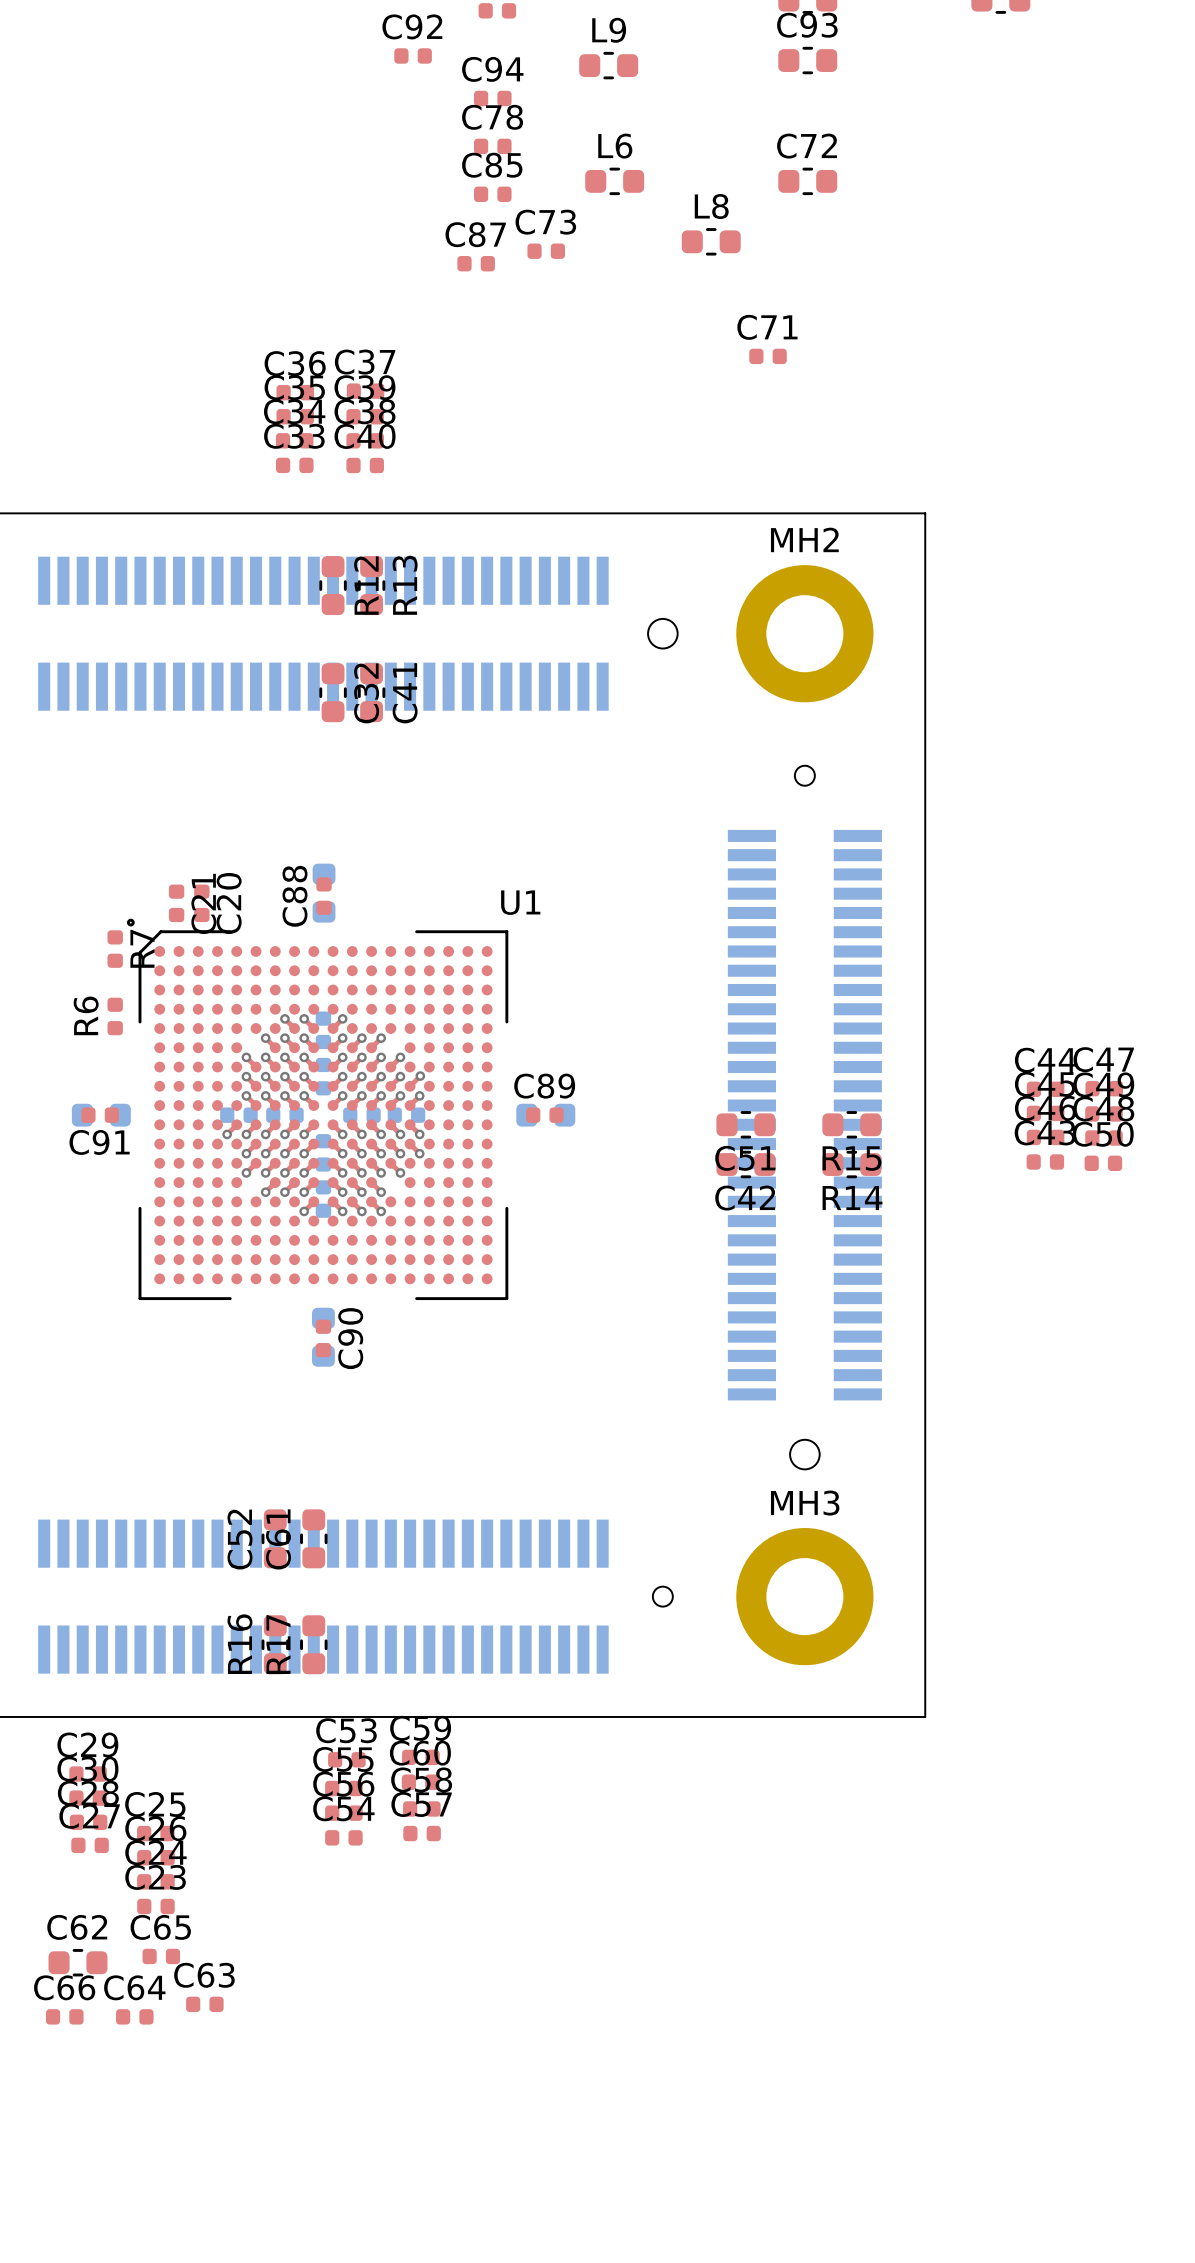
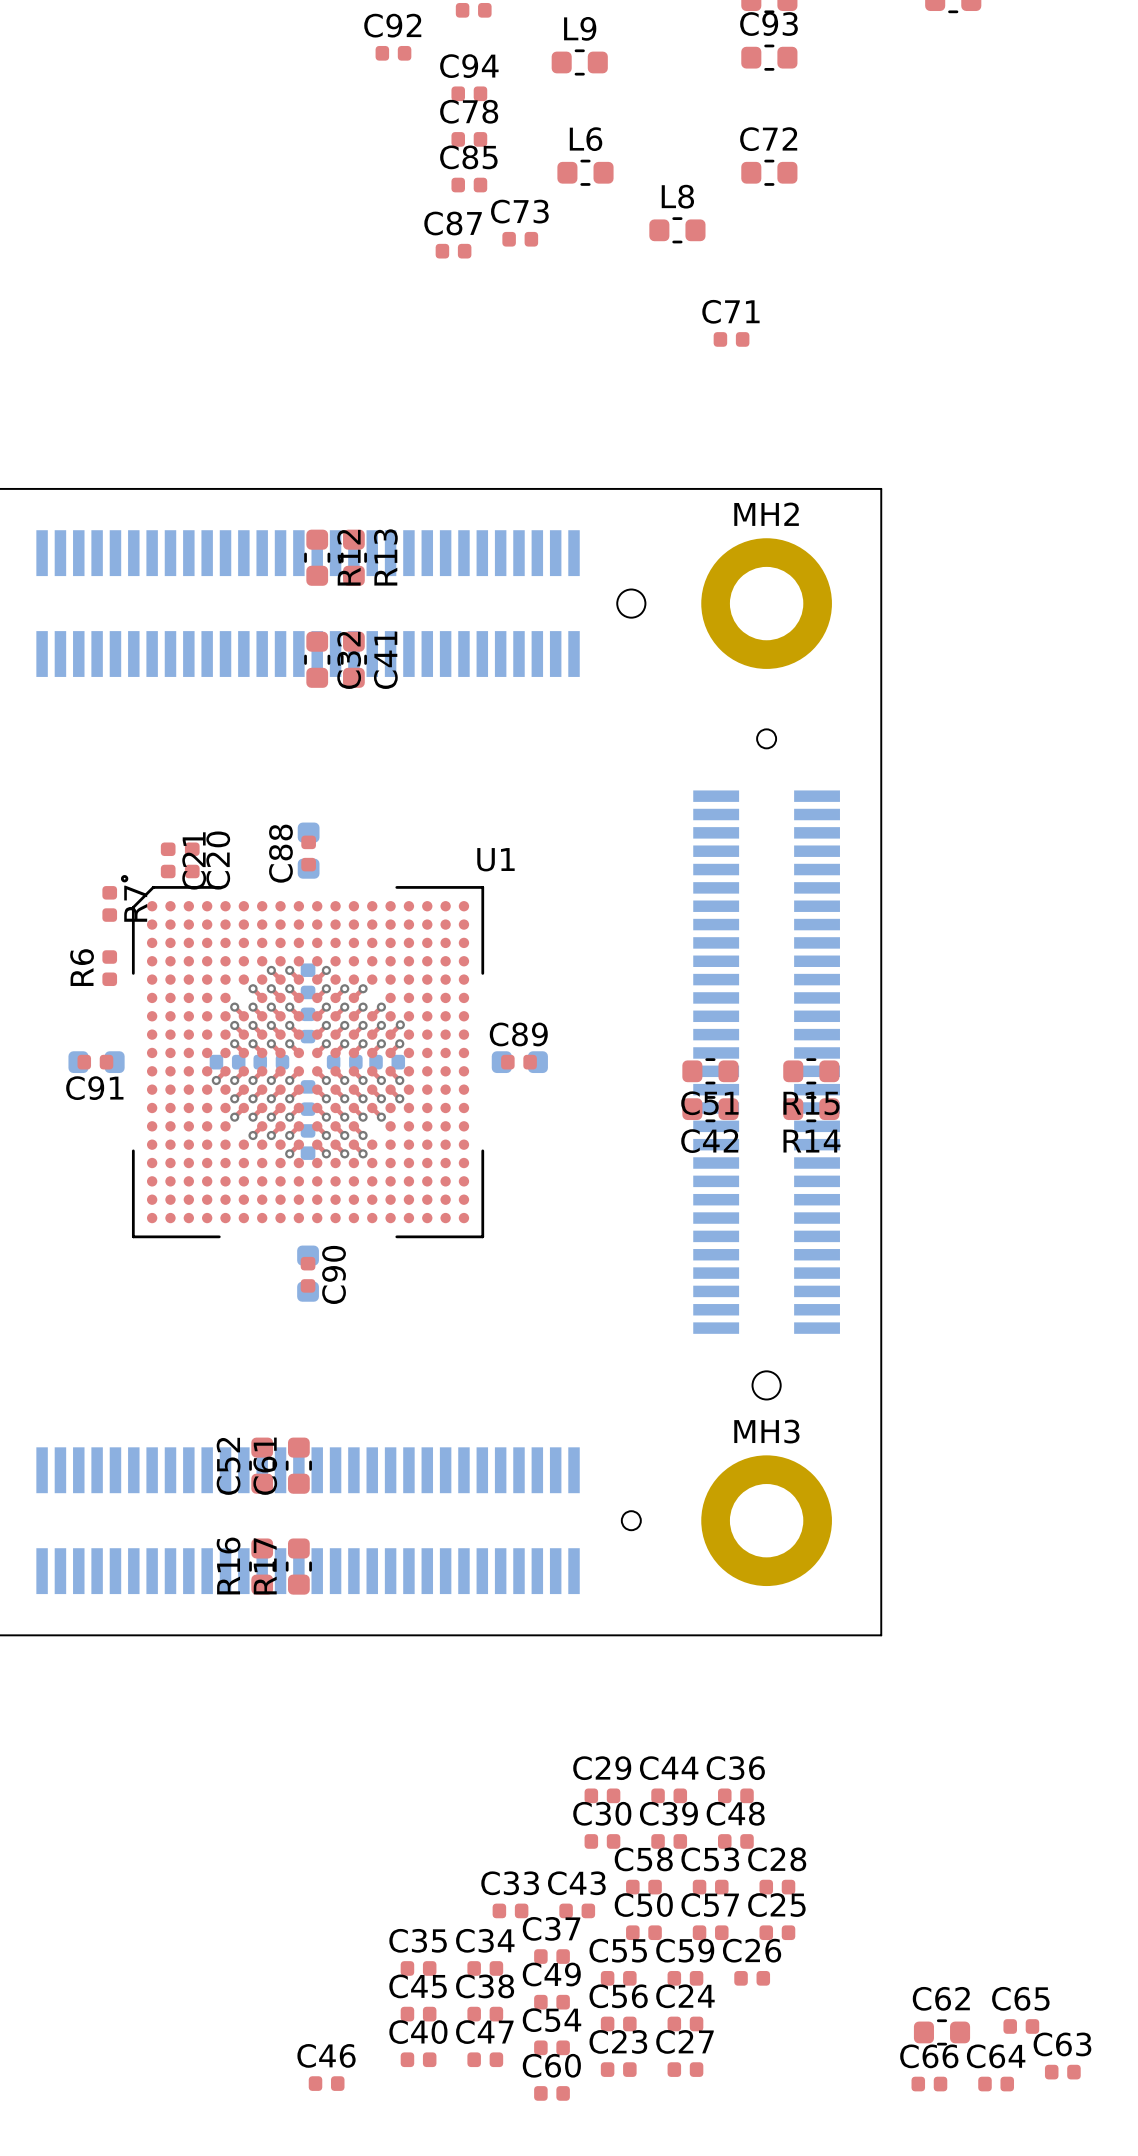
C37 position: (365, 391) -> (552, 1956)
C36 position: (295, 392) -> (735, 1795)
C35 position: (295, 416) -> (418, 1968)
C39 position: (365, 416) -> (669, 1841)
C34 position: (294, 440) -> (485, 1968)
C38 position: (365, 440) -> (485, 2014)
C33 position: (294, 465) -> (510, 1910)
C40 position: (365, 465) -> (418, 2059)
C47 position: (1104, 1088) -> (485, 2059)
C44 position: (1045, 1089) -> (669, 1795)
C45 position: (1045, 1113) -> (418, 2014)
C49 position: (1103, 1113) -> (552, 2002)
C46 position: (1045, 1137) -> (326, 2083)
C48 position: (1103, 1138) -> (735, 1841)
C43 position: (1045, 1161) -> (577, 1910)
C50 position: (1103, 1163) -> (643, 1932)
C59 position: (420, 1757) -> (685, 1978)
C53 position: (346, 1759) -> (710, 1887)
C29 position: (88, 1774) -> (602, 1795)
C60 position: (420, 1782) -> (552, 2093)
C55 position: (343, 1788) -> (618, 1978)
C30 position: (88, 1798) -> (602, 1841)
C58 position: (421, 1808) -> (643, 1887)
C56 position: (343, 1813) -> (618, 2023)
C28 position: (88, 1822) -> (777, 1887)
C25 position: (155, 1833) -> (777, 1932)
C57 position: (422, 1833) -> (710, 1932)
C54 position: (343, 1837) -> (552, 2047)
C27 position: (90, 1845) -> (685, 2069)
C26 position: (155, 1857) -> (752, 1978)
C24 position: (155, 1881) -> (685, 2023)
C23 position: (155, 1906) -> (618, 2069)
C65 position: (161, 1956) -> (1021, 2026)
C62 position: (77, 1962) -> (942, 2032)
C63 position: (204, 2004) -> (1062, 2072)
C66 position: (64, 2016) -> (929, 2084)
C64 position: (134, 2016) -> (996, 2084)

